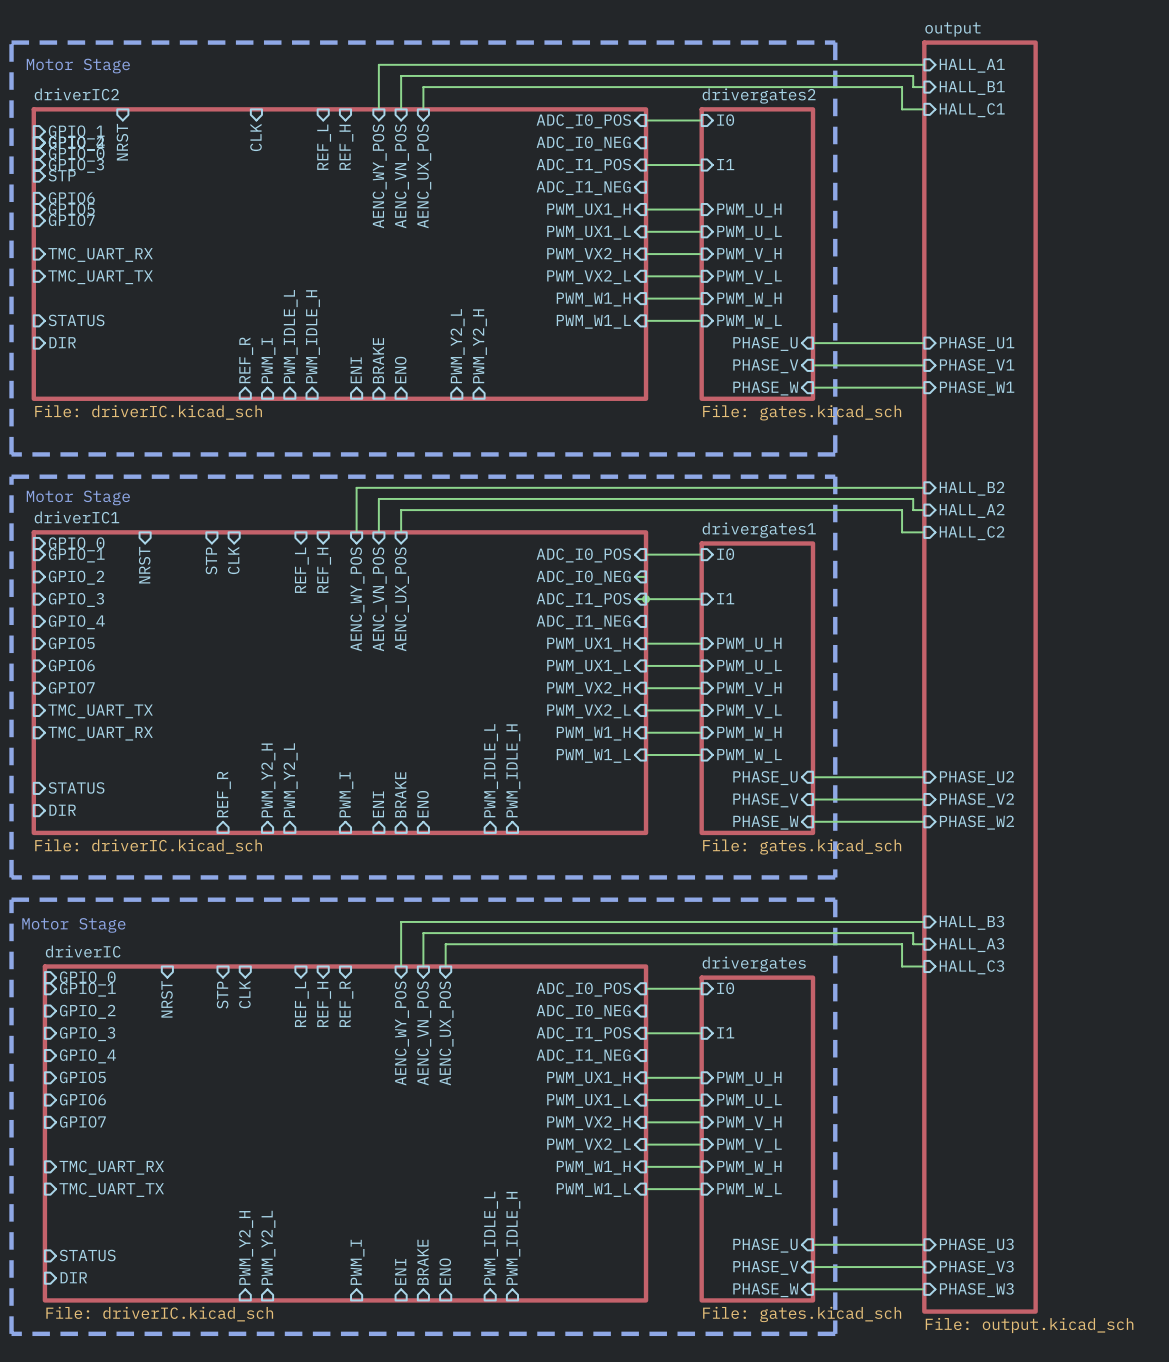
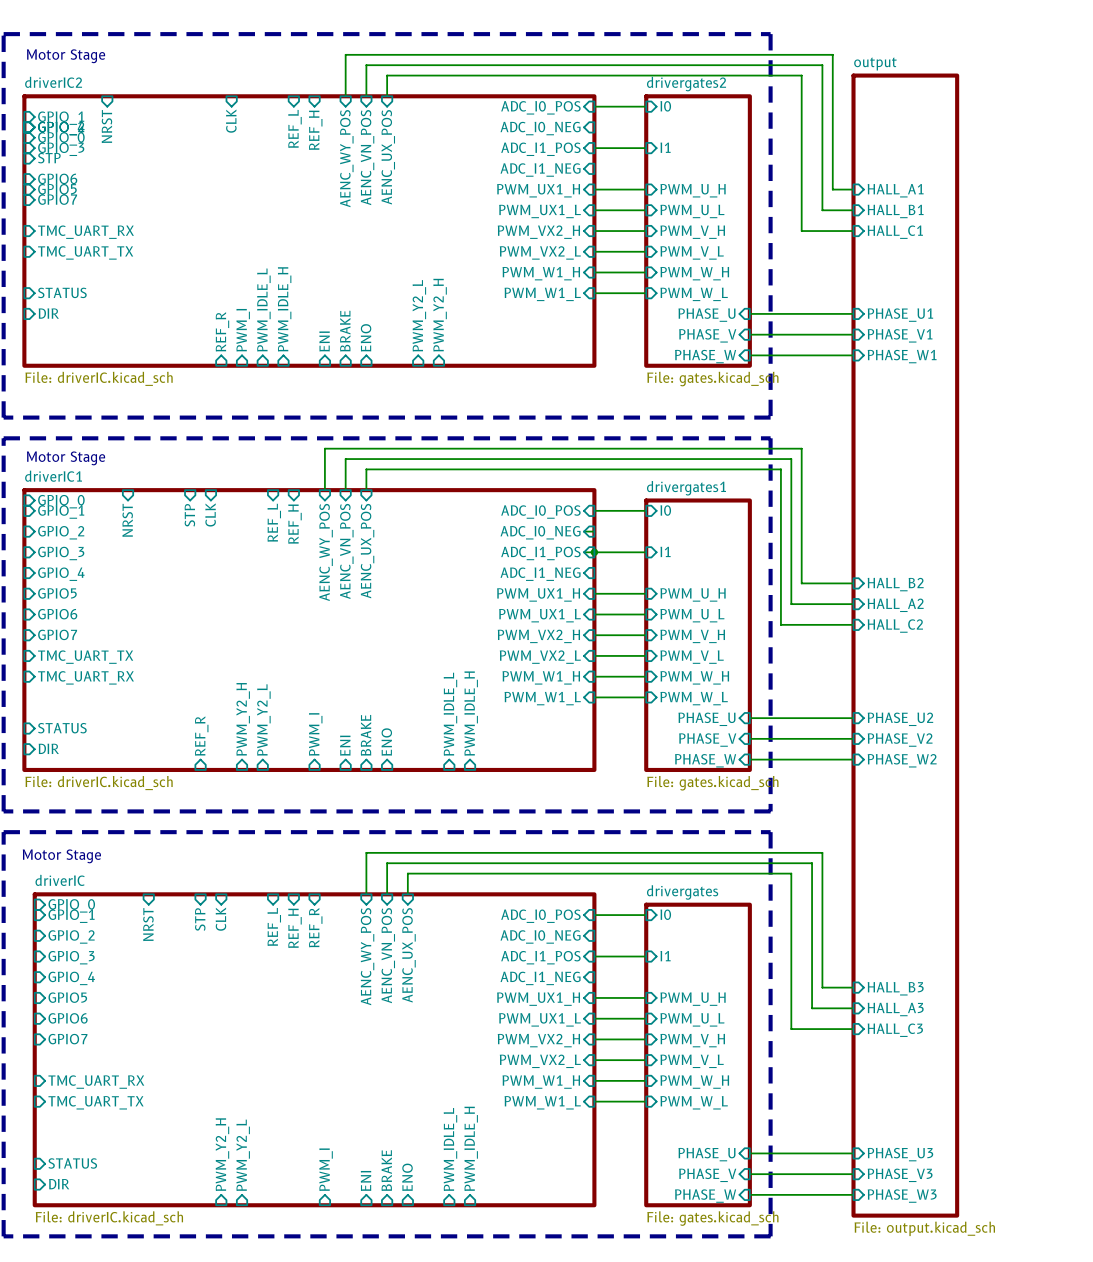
wire: (902, 64) (924, 64) -> (832, 54) (832, 75)
sheet pin position: HALL_A1 (972, 65) -> HALL_A1 (895, 190)
wire: (890, 75) (913, 75) (913, 87) (924, 87) -> (822, 65) (822, 210) (853, 210)
wire: (868, 87) (902, 87) -> (801, 75) (801, 231) (853, 231)
sheet pin position: HALL_B1 (972, 88) -> HALL_B1 (895, 211)
wire: (902, 109) (924, 109) -> (832, 96) (832, 189) (853, 189)
sheet pin position: HALL_C1 (972, 110) -> HALL_C1 (895, 232)
wire: (868, 487) (924, 487) -> (801, 448) (801, 583) (853, 583)
sheet pin position: HALL_B2 (972, 488) -> HALL_B2 (895, 584)
wire: (857, 498) (913, 498) (913, 510) (924, 510) -> (791, 459) (791, 604) (853, 604)
wire: (846, 510) (902, 510) (902, 532) (924, 532) -> (780, 469) (780, 624) (853, 624)
sheet pin position: HALL_A2 (972, 510) -> HALL_A2 (895, 605)
sheet pin position: HALL_C2 (972, 533) -> HALL_C2 (895, 626)
sheet output: File: output.kicad_sch (979, 677) -> none
sheet output: none -> File: output.kicad_sch (905, 645)
wire: (890, 921) (924, 921) -> (822, 852) (822, 987) (853, 987)
sheet pin position: HALL_B3 (971, 922) -> HALL_B3 (895, 988)
wire: (879, 933) (913, 933) (913, 944) (924, 944) -> (812, 863) (812, 1008) (853, 1008)
wire: (857, 944) (902, 944) (902, 966) (924, 966) -> (791, 873) (791, 1029) (853, 1029)
sheet pin position: HALL_A3 (971, 945) -> HALL_A3 (895, 1009)
sheet pin position: HALL_C3 (971, 967) -> HALL_C3 (895, 1030)

